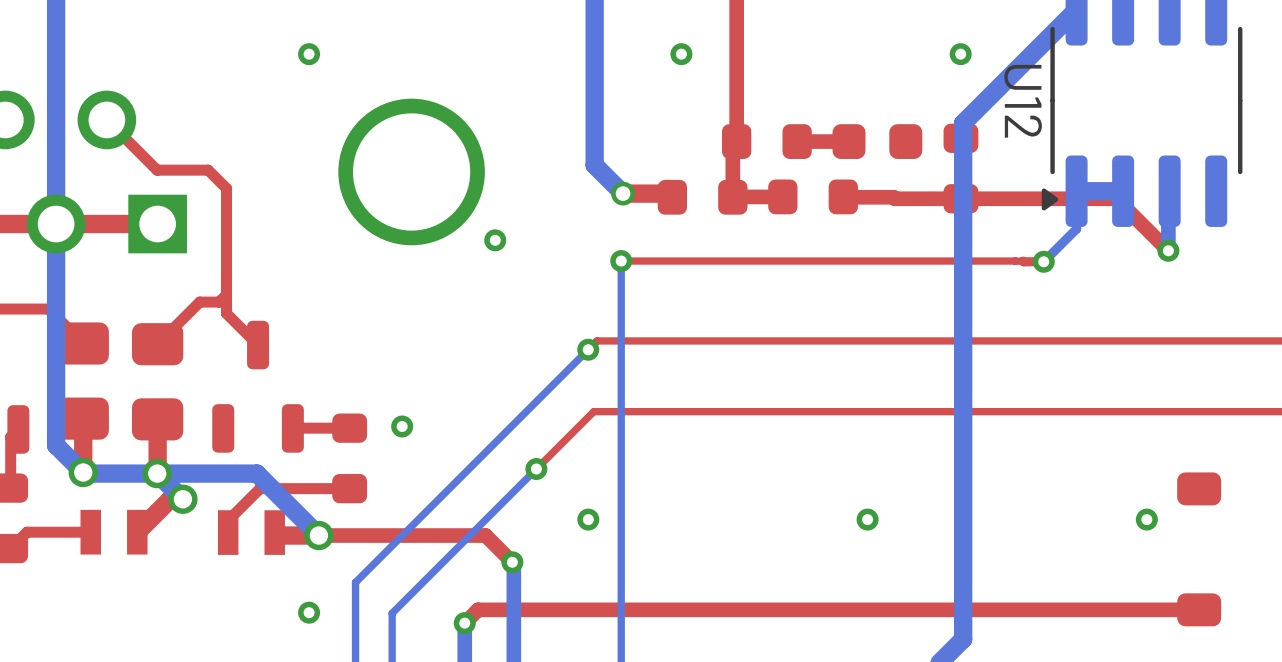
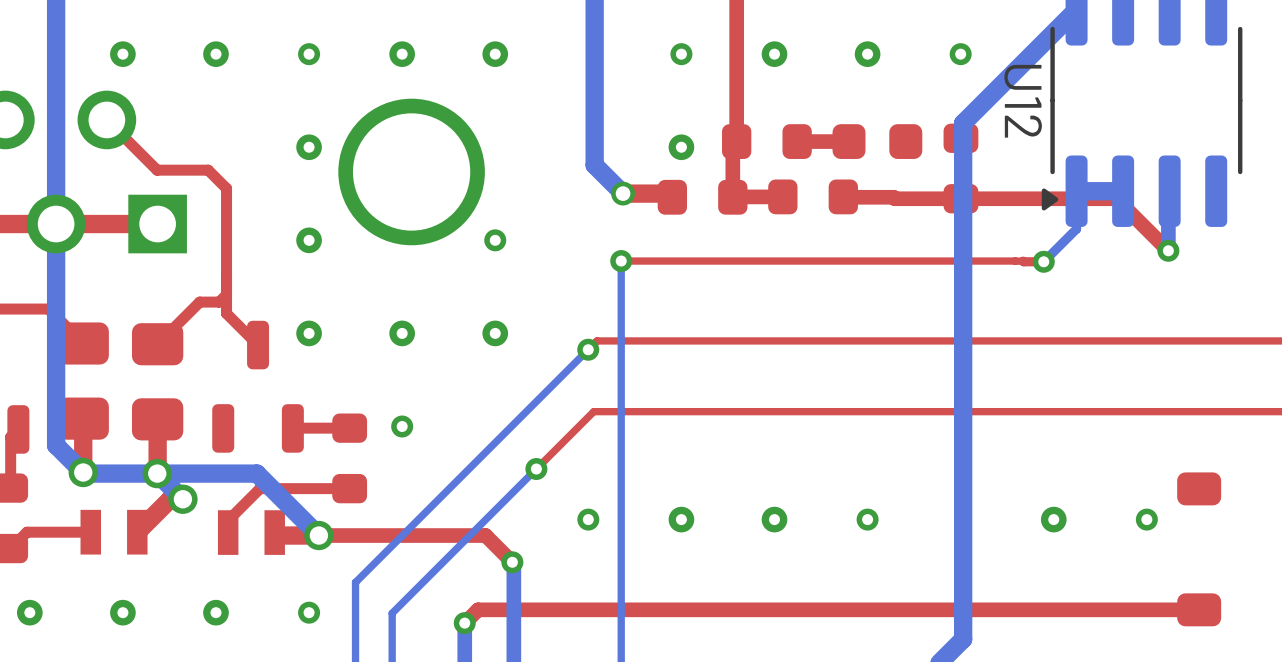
via: none -> (122, 54)
via: none -> (215, 54)
via: none -> (402, 54)
via: none -> (495, 54)
via: none -> (774, 54)
via: none -> (867, 54)
via: none -> (309, 147)
via: none -> (681, 147)
via: none -> (309, 240)
via: none -> (309, 333)
via: none -> (402, 333)
via: none -> (495, 333)
via: none -> (681, 519)
via: none -> (774, 519)
via: none -> (1053, 519)
via: none -> (29, 612)
via: none -> (122, 612)
via: none -> (215, 612)

